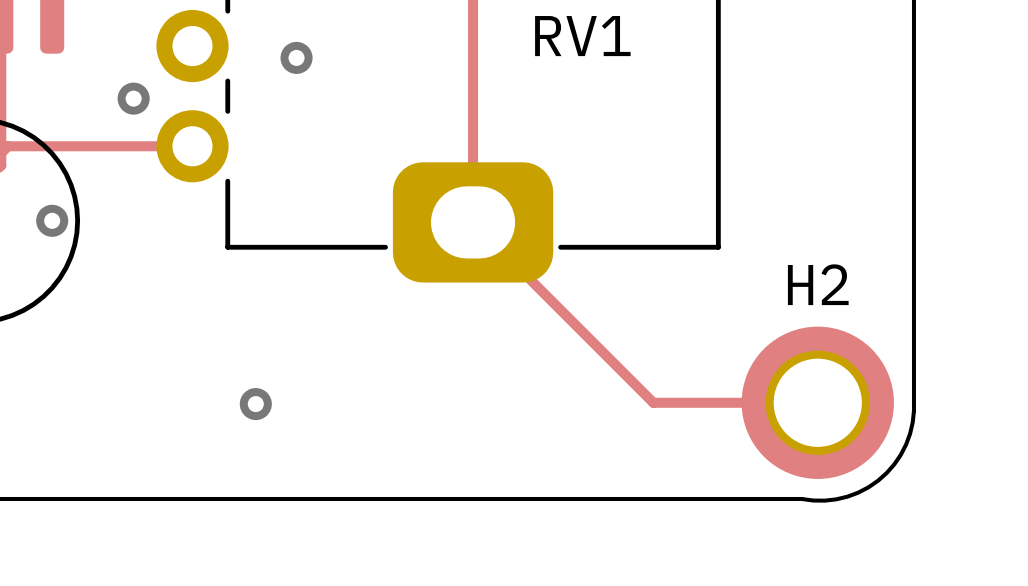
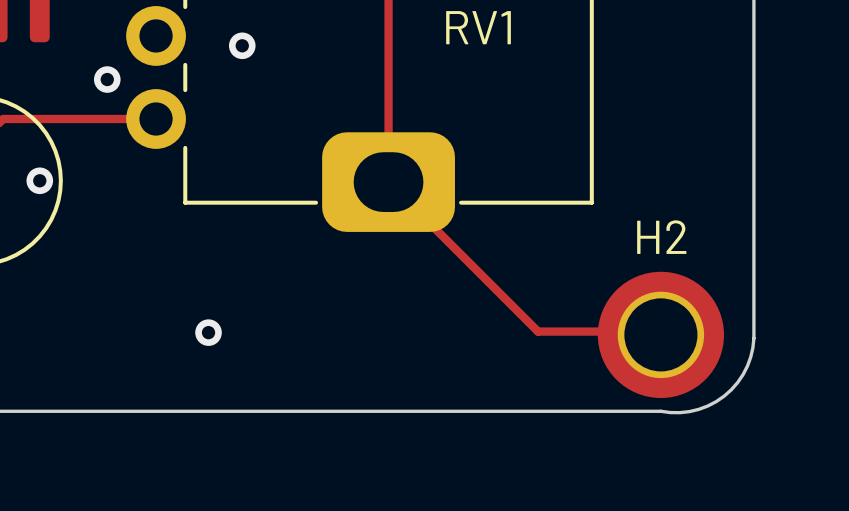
H2 position: (817, 402) -> (660, 334)

